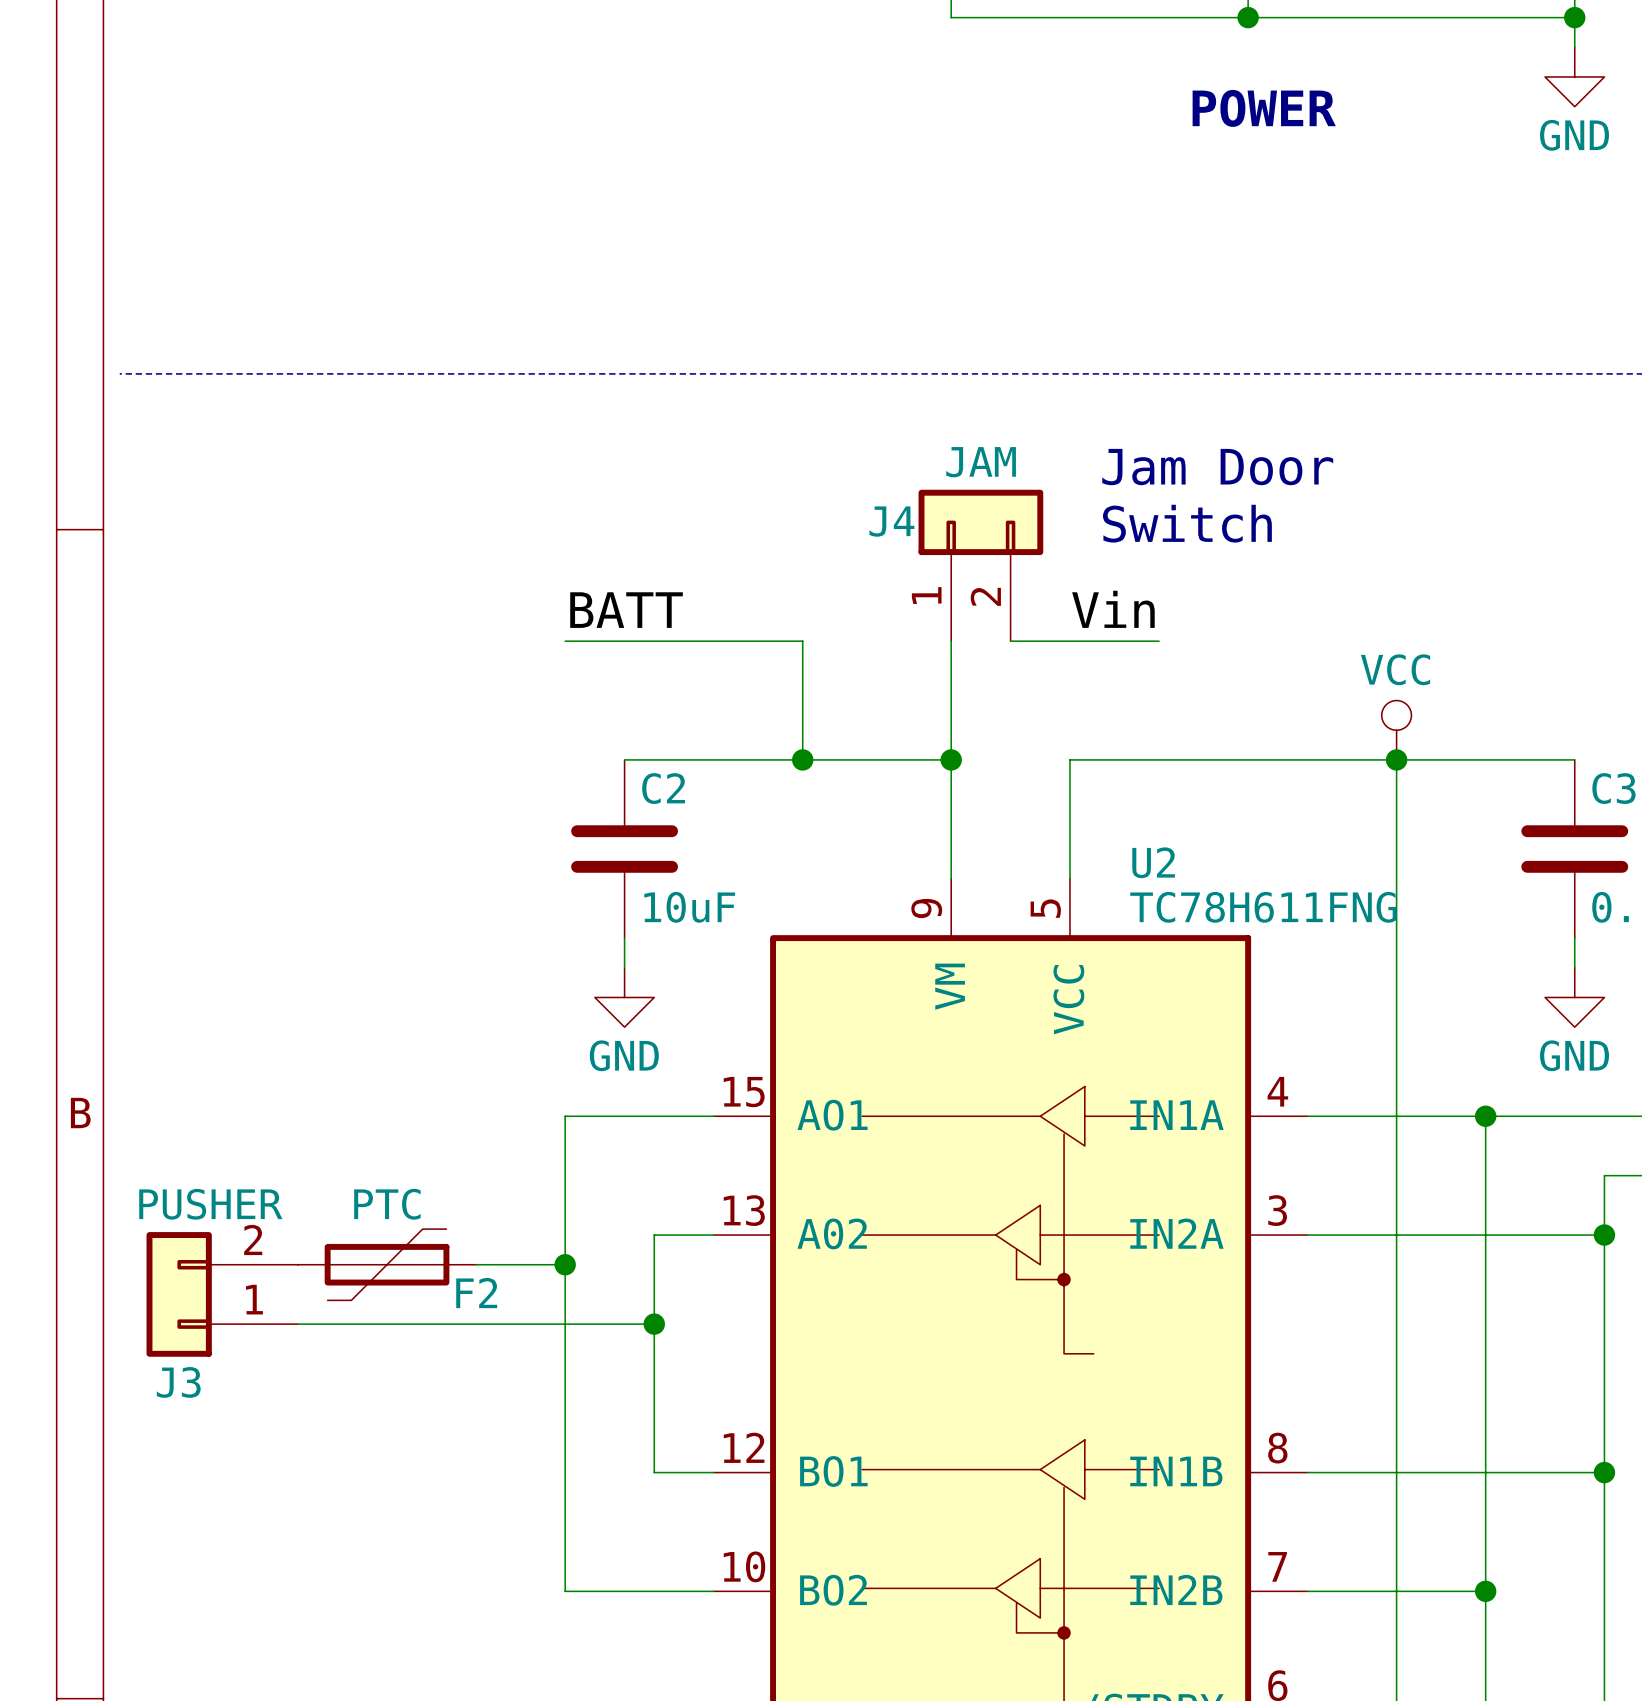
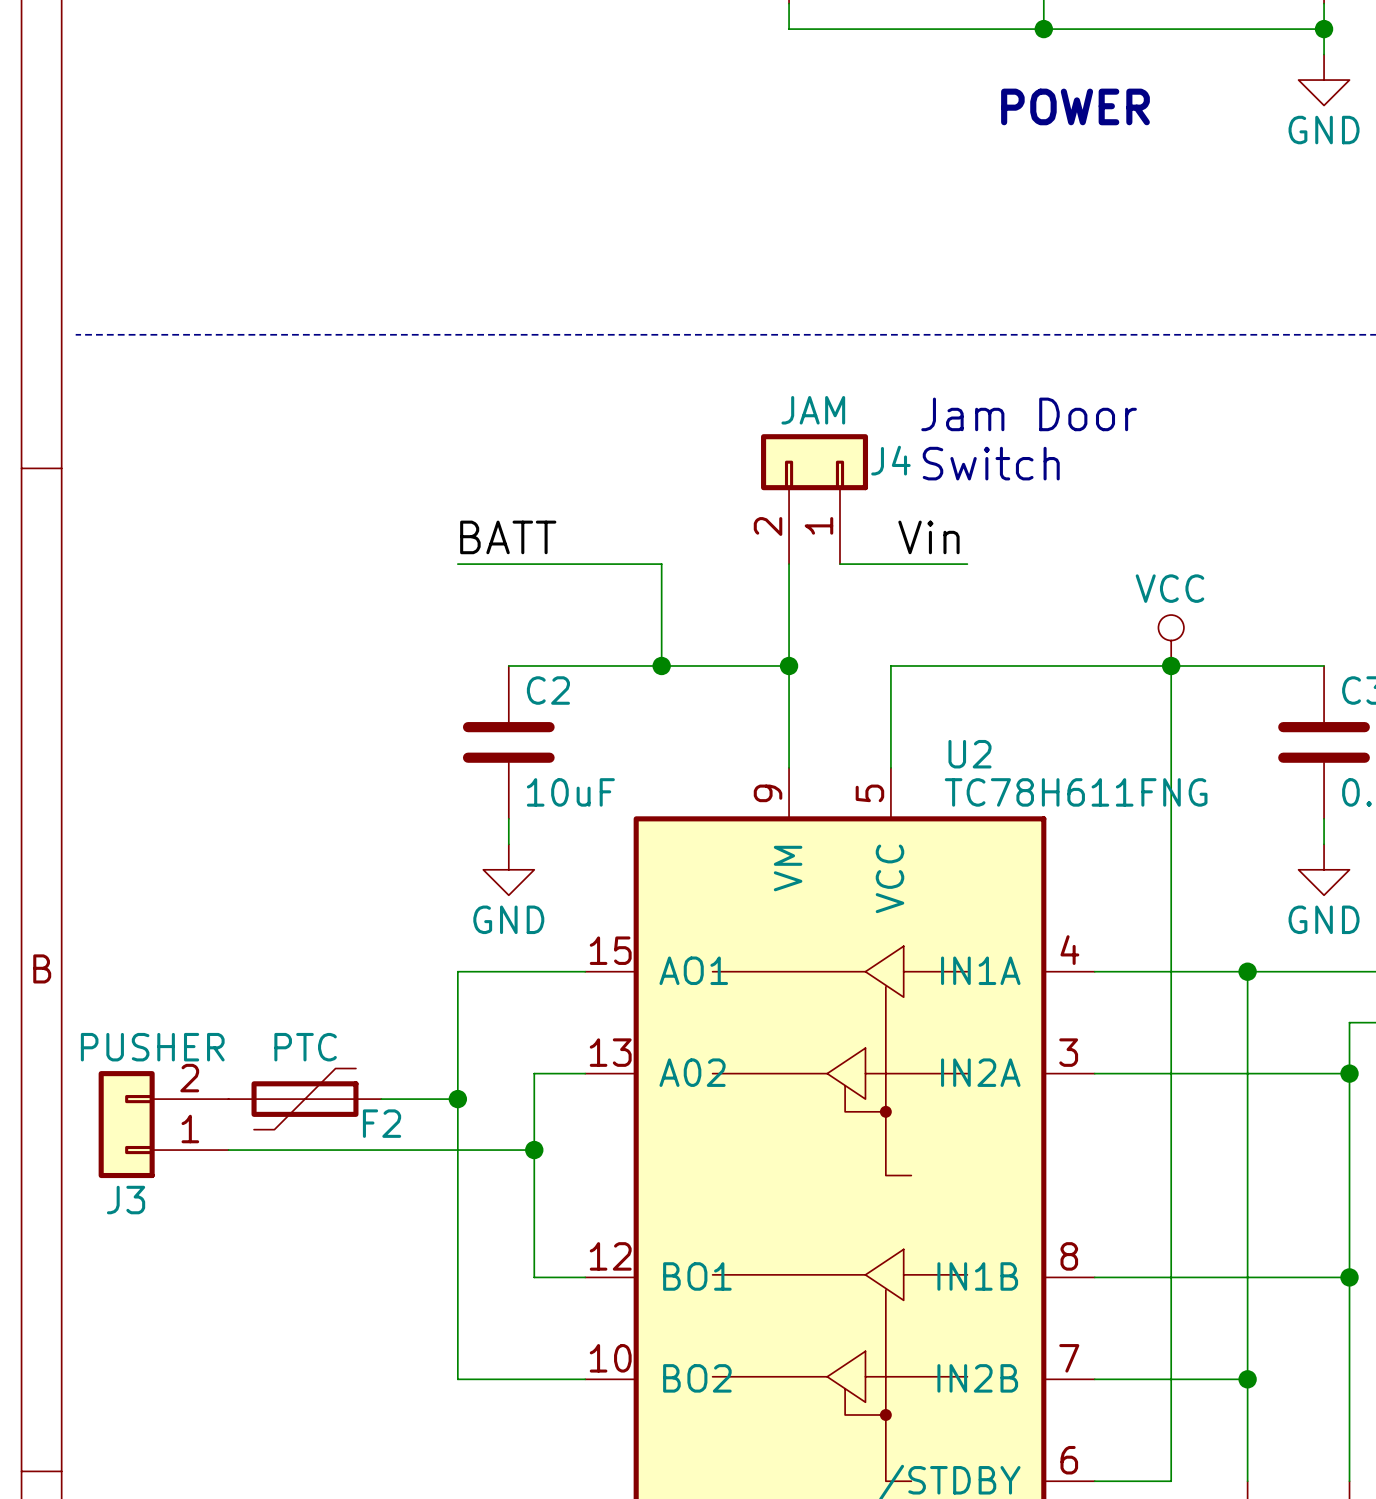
J4 flip: as is (980, 522) -> left-right (814, 462)

